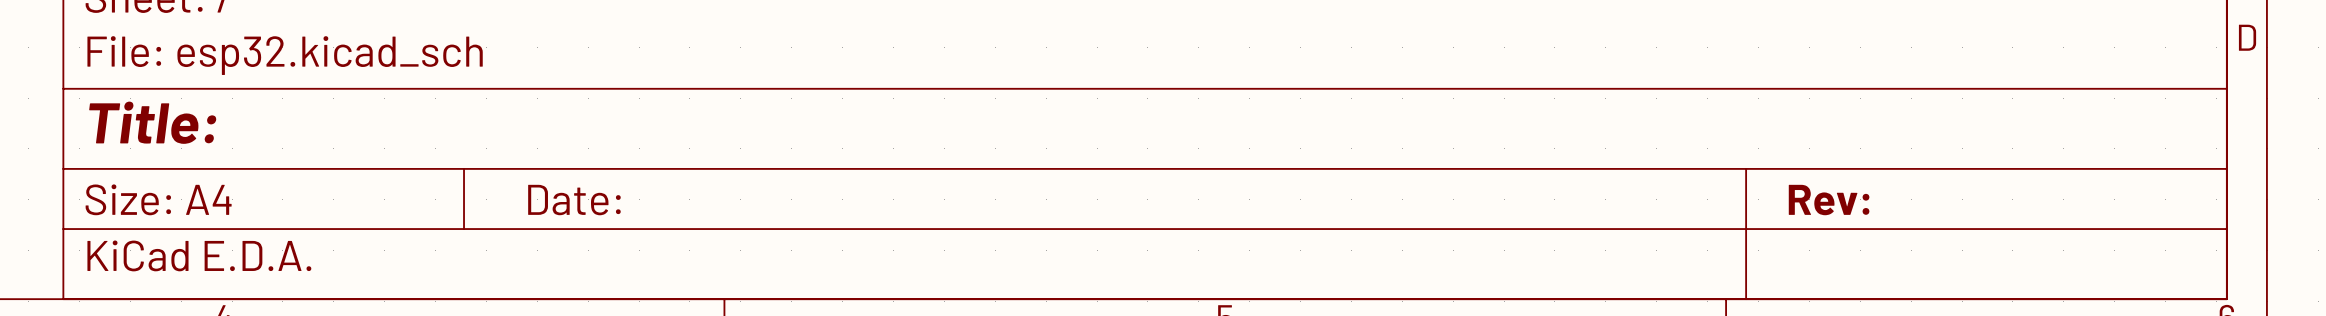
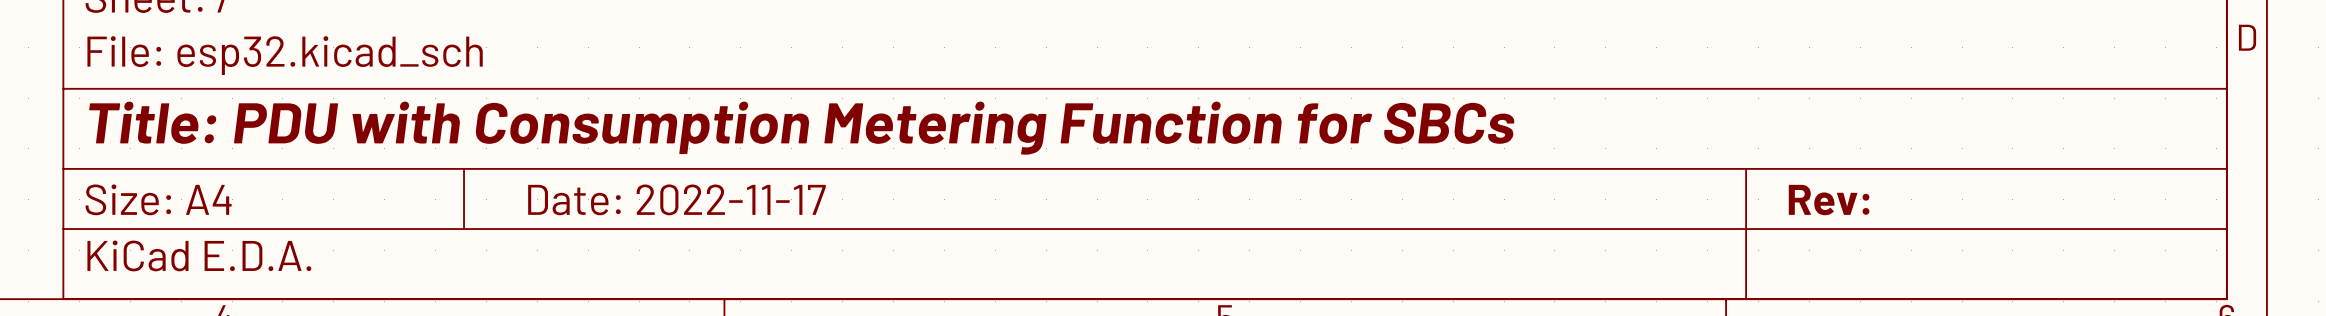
title block: Title: (152, 122) -> Title: PDU with Consumption Metering Function for SBCs (801, 128)
title block: Date: (574, 200) -> Date: 2022-11-17 (676, 199)

